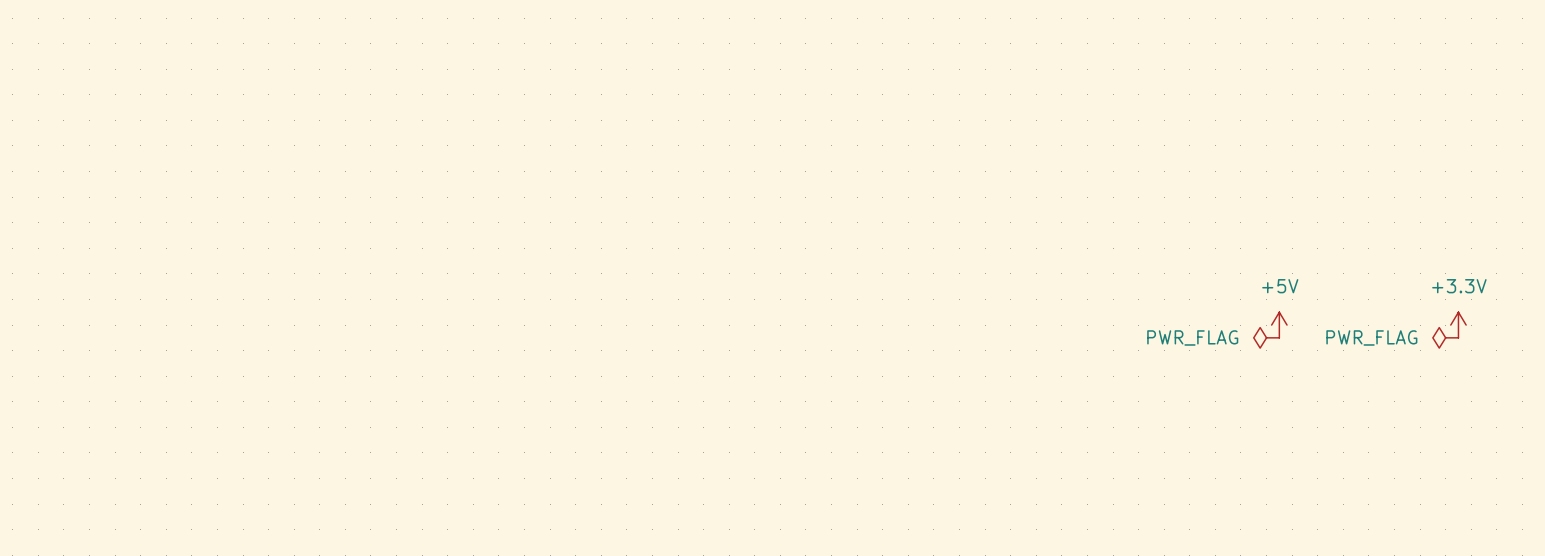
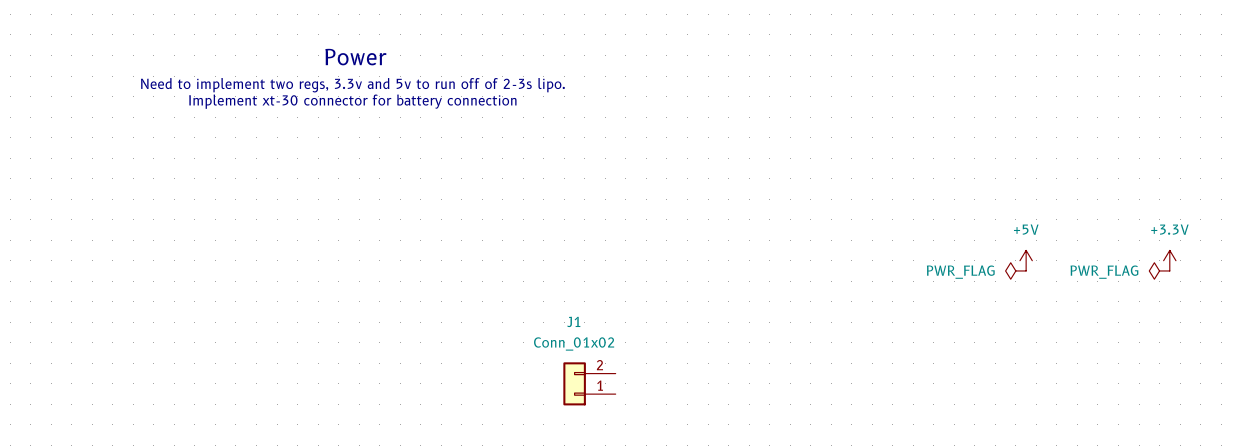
text: none -> Power (355, 57)
text: none -> Need to implement two regs, 3.3v and 5v to run off of 2-3s lipo. (352, 85)
text: none -> Implement xt-30 connector for battery connection (352, 101)
J1: none -> Conn_01x02 (589, 383)

